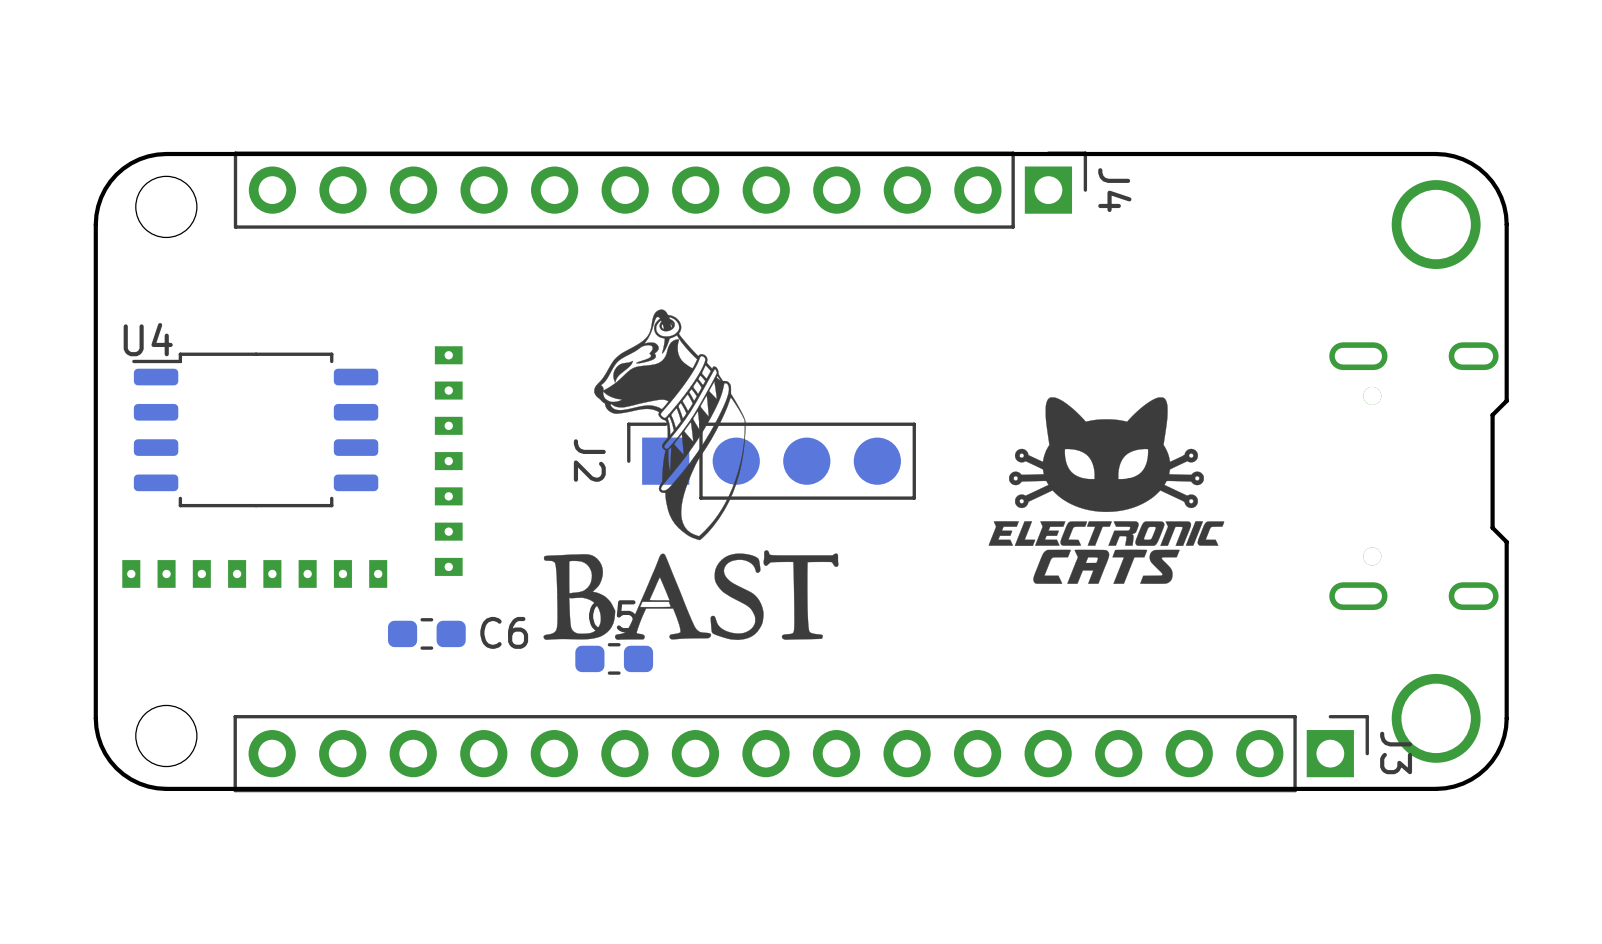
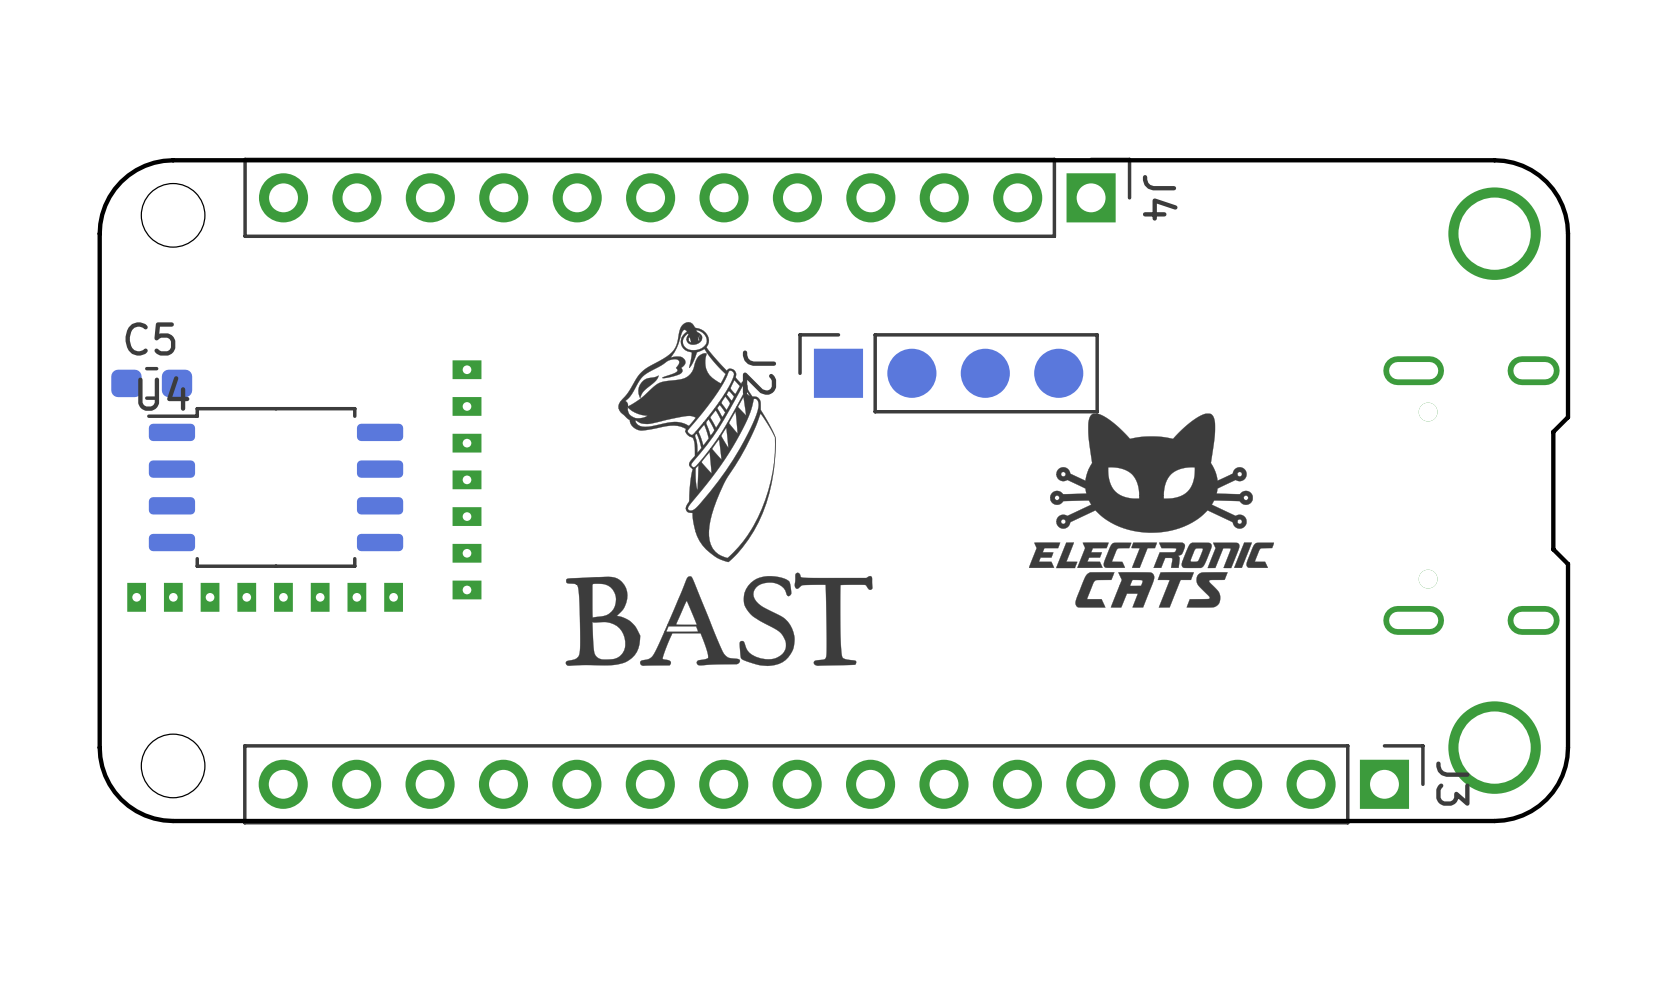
U4 position: (255, 429) -> (275, 487)
J2 position: (771, 461) -> (948, 373)
C6: (426, 633) -> none
C5 position: (614, 658) -> (151, 383)

